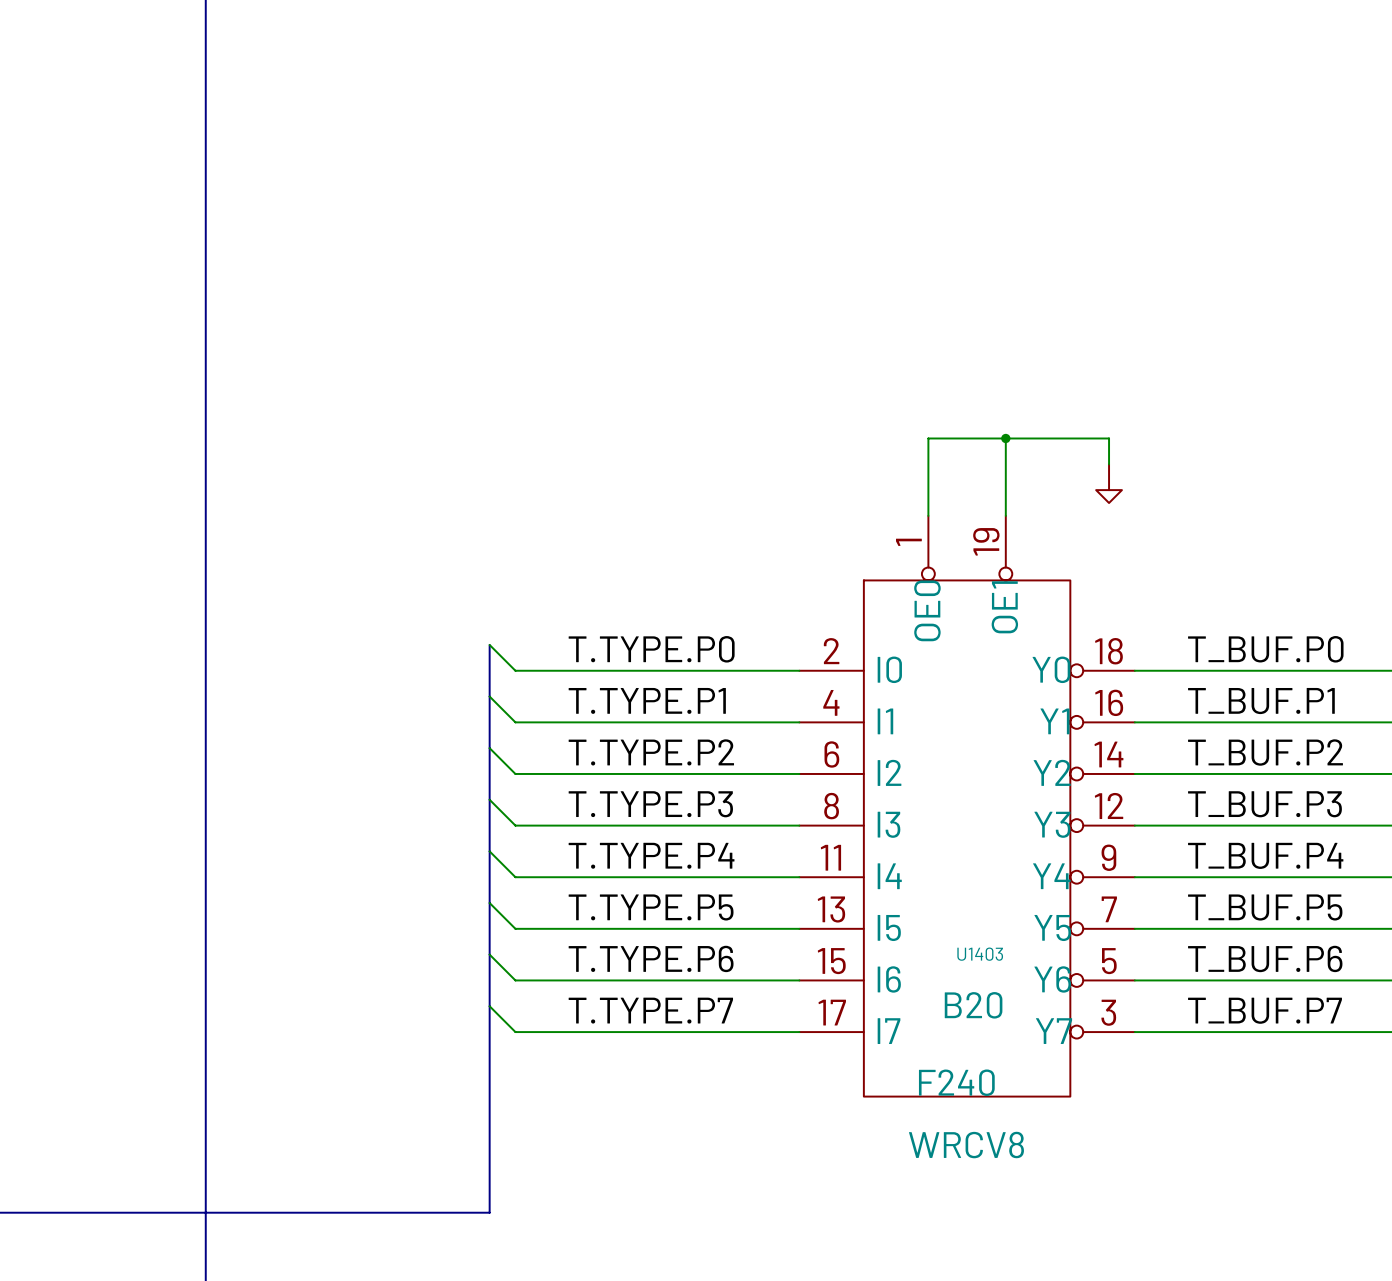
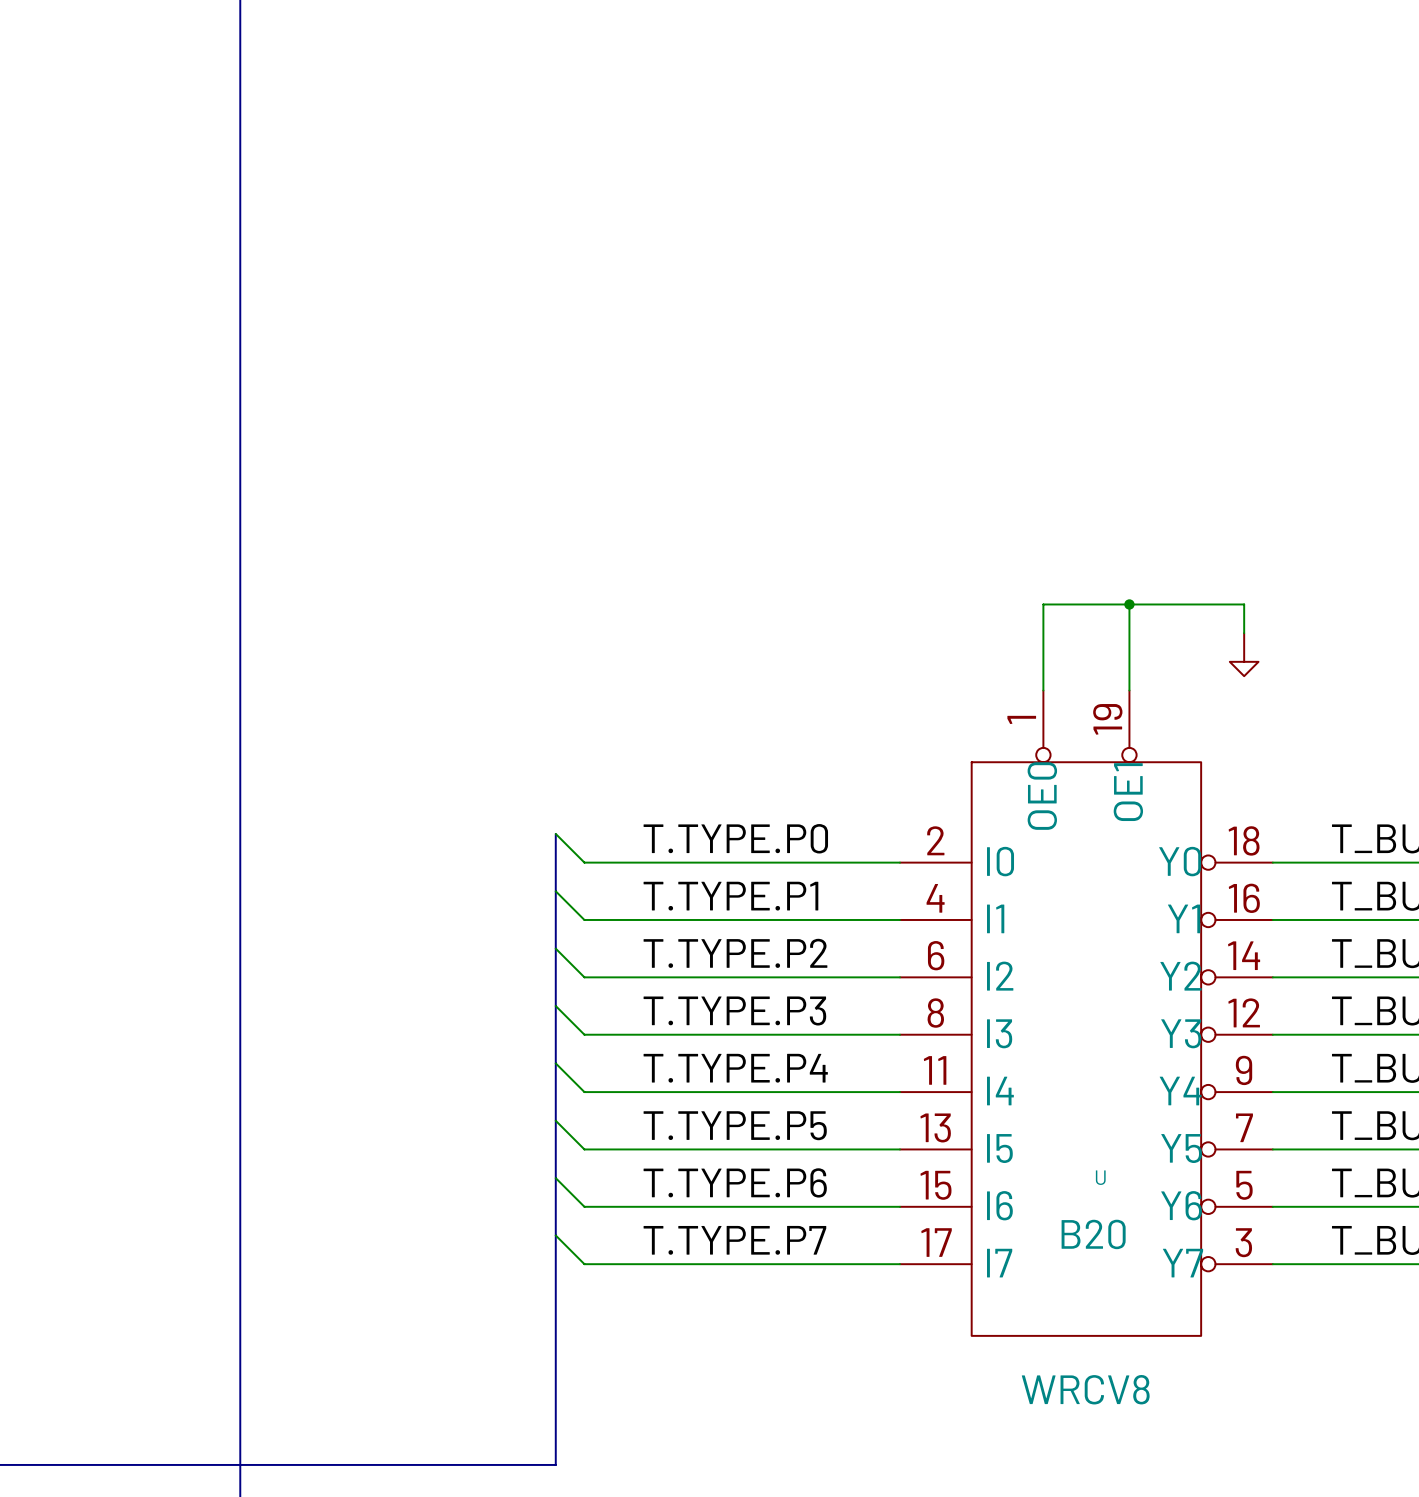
U1403 name: U1403 (980, 954) -> U (1100, 1177)
U1403 value: F240 (956, 1082) -> none

